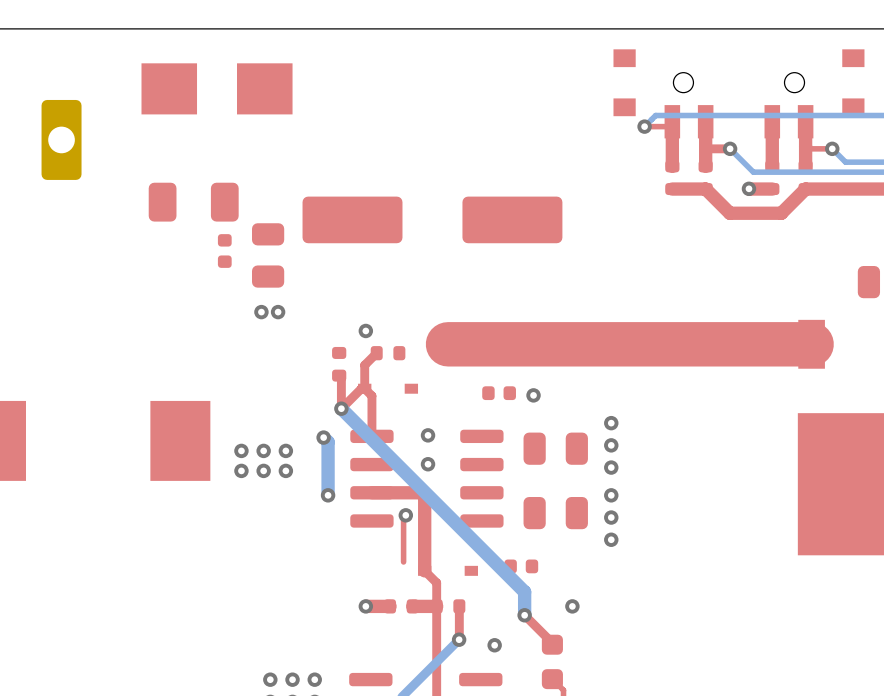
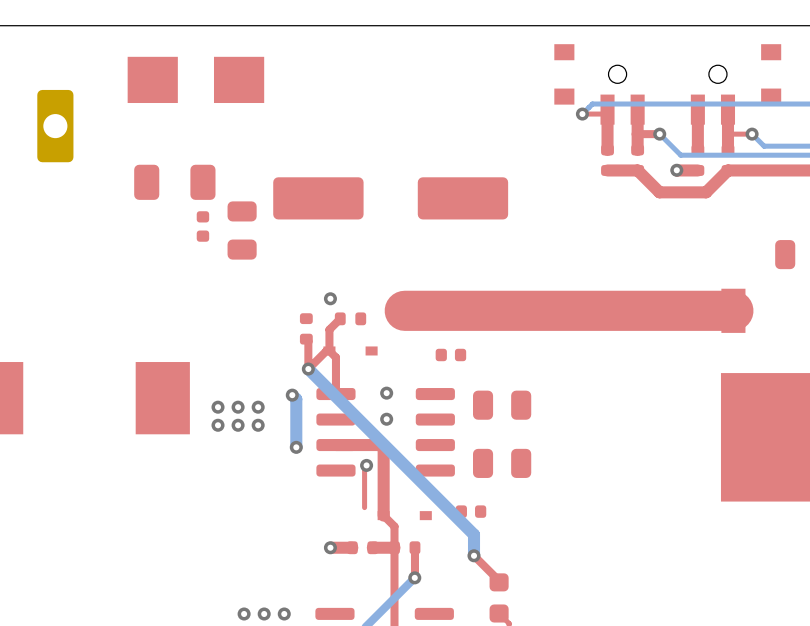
via: (261, 312) -> none
via: (278, 312) -> none
via: (533, 395) -> none
via: (611, 423) -> none
via: (611, 445) -> none
via: (611, 467) -> none
via: (611, 495) -> none
via: (611, 517) -> none
via: (611, 539) -> none
via: (572, 606) -> none
via: (494, 645) -> none

